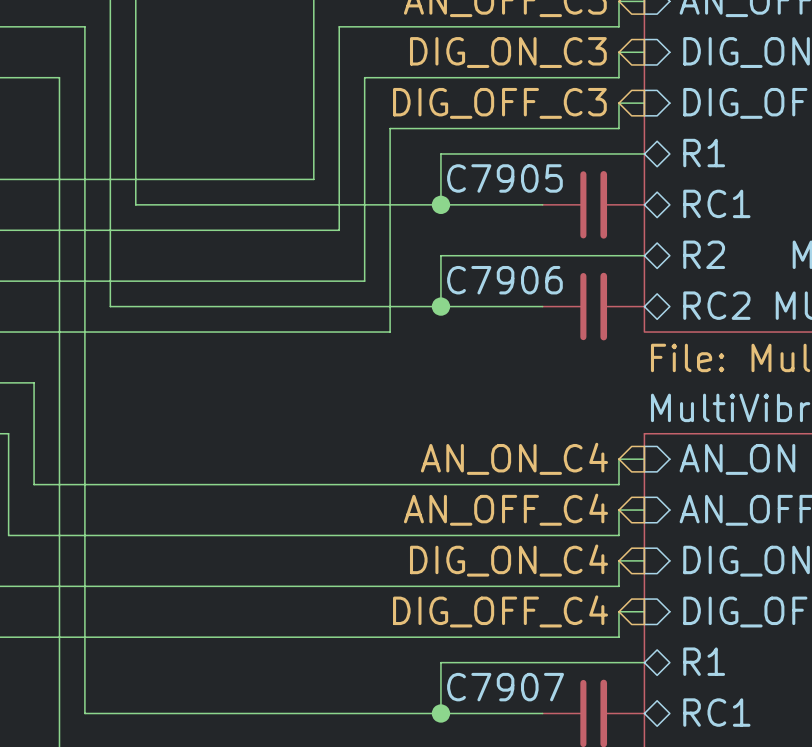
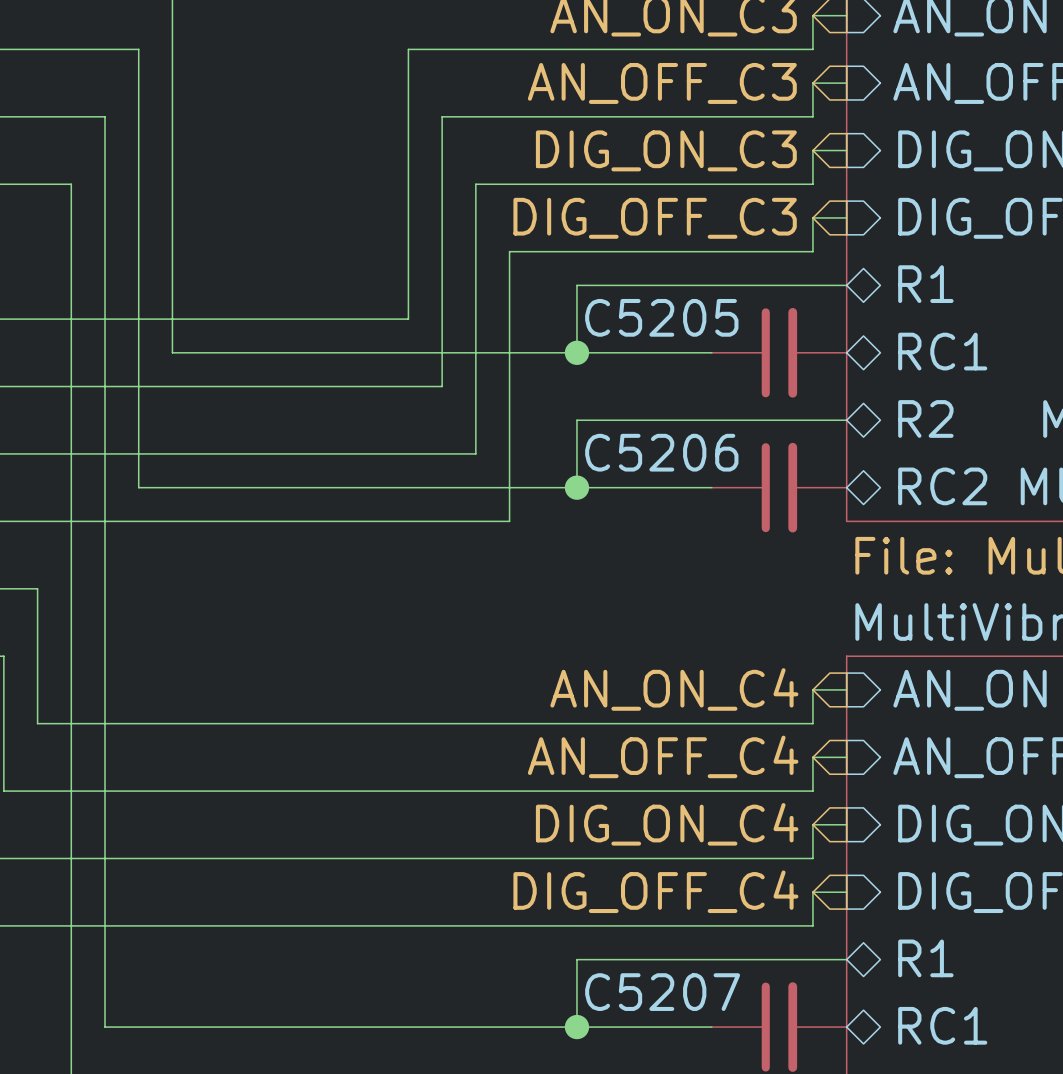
C7905 name: C7905 (504, 178) -> C5205 (661, 317)
C7906 name: C7906 (504, 280) -> C5206 (661, 452)
C7907 name: C7907 (505, 687) -> C5207 (662, 992)

